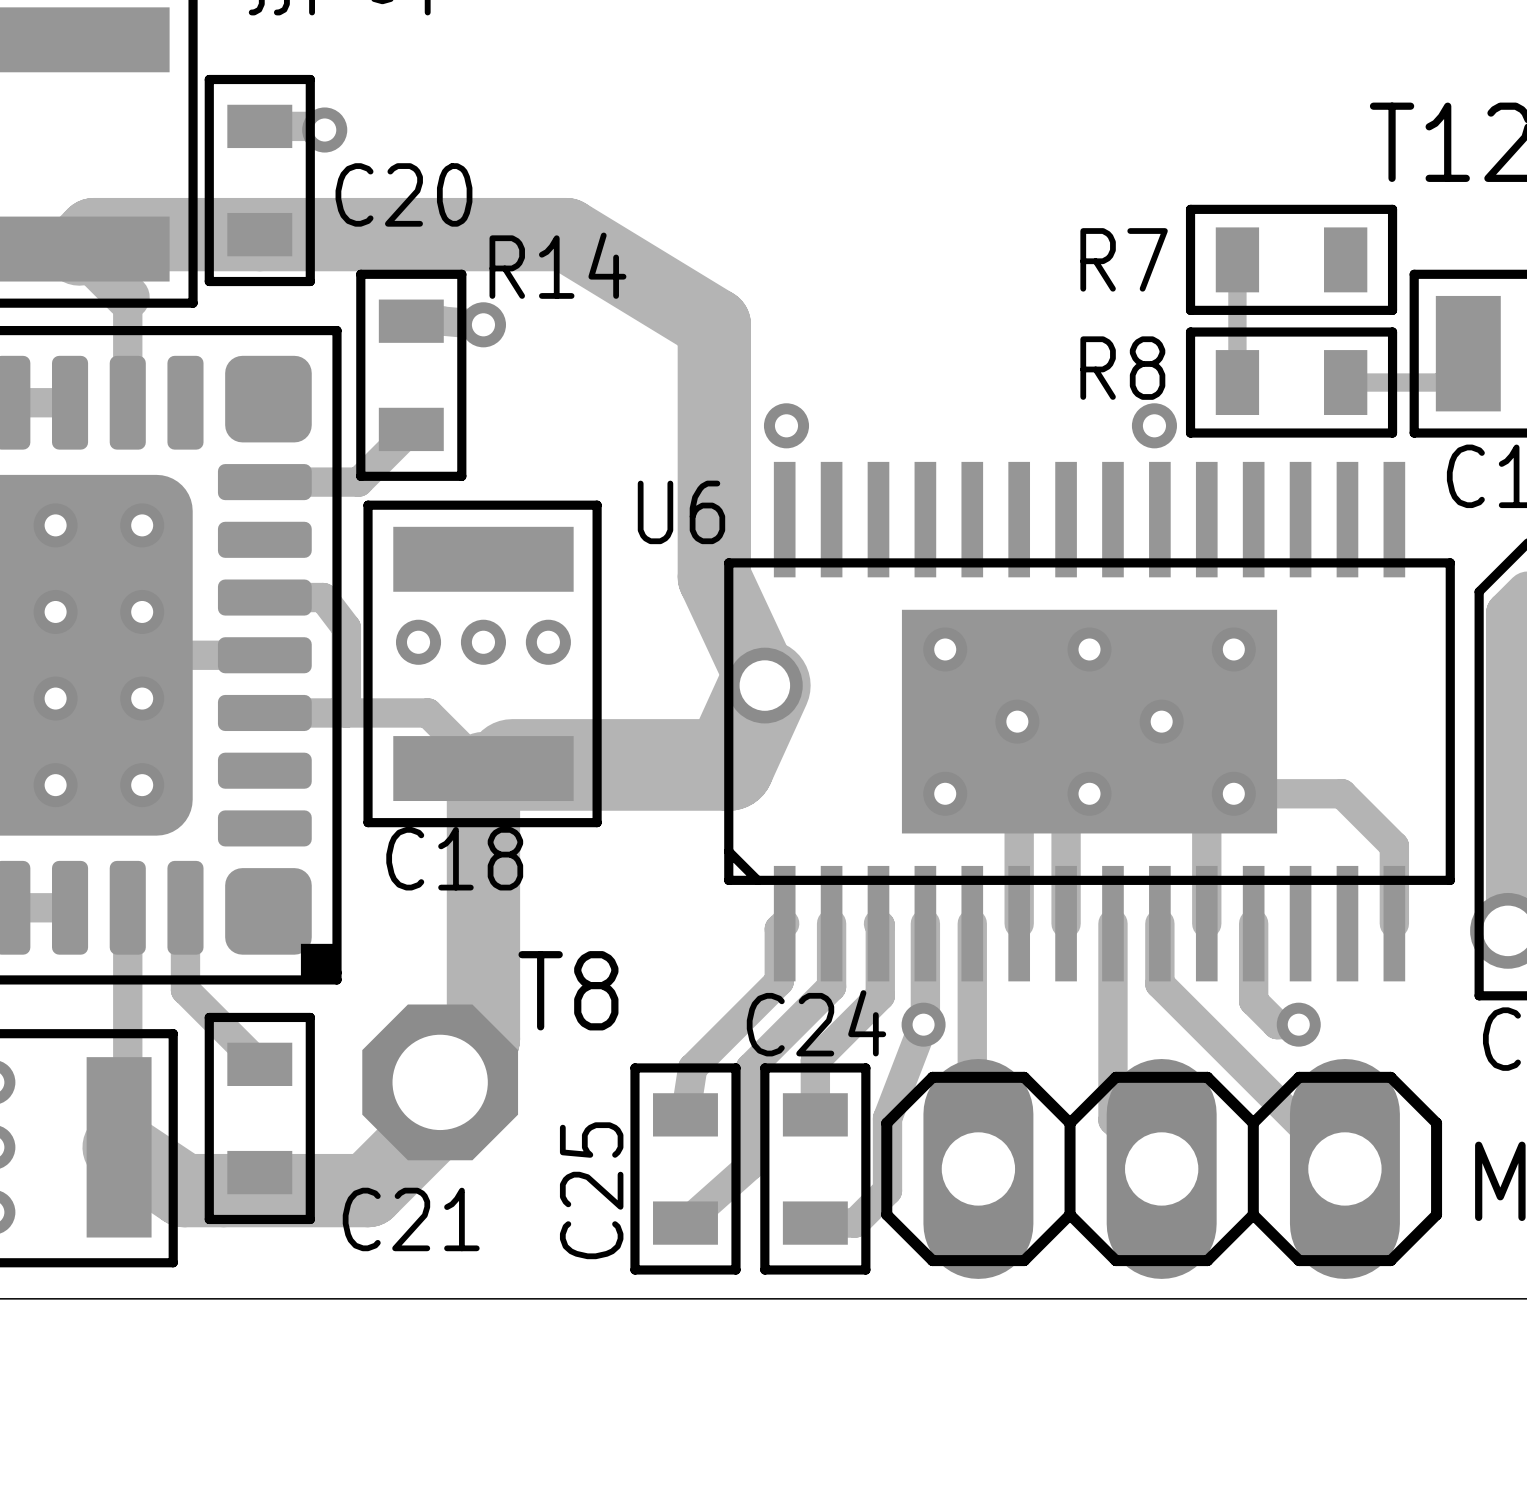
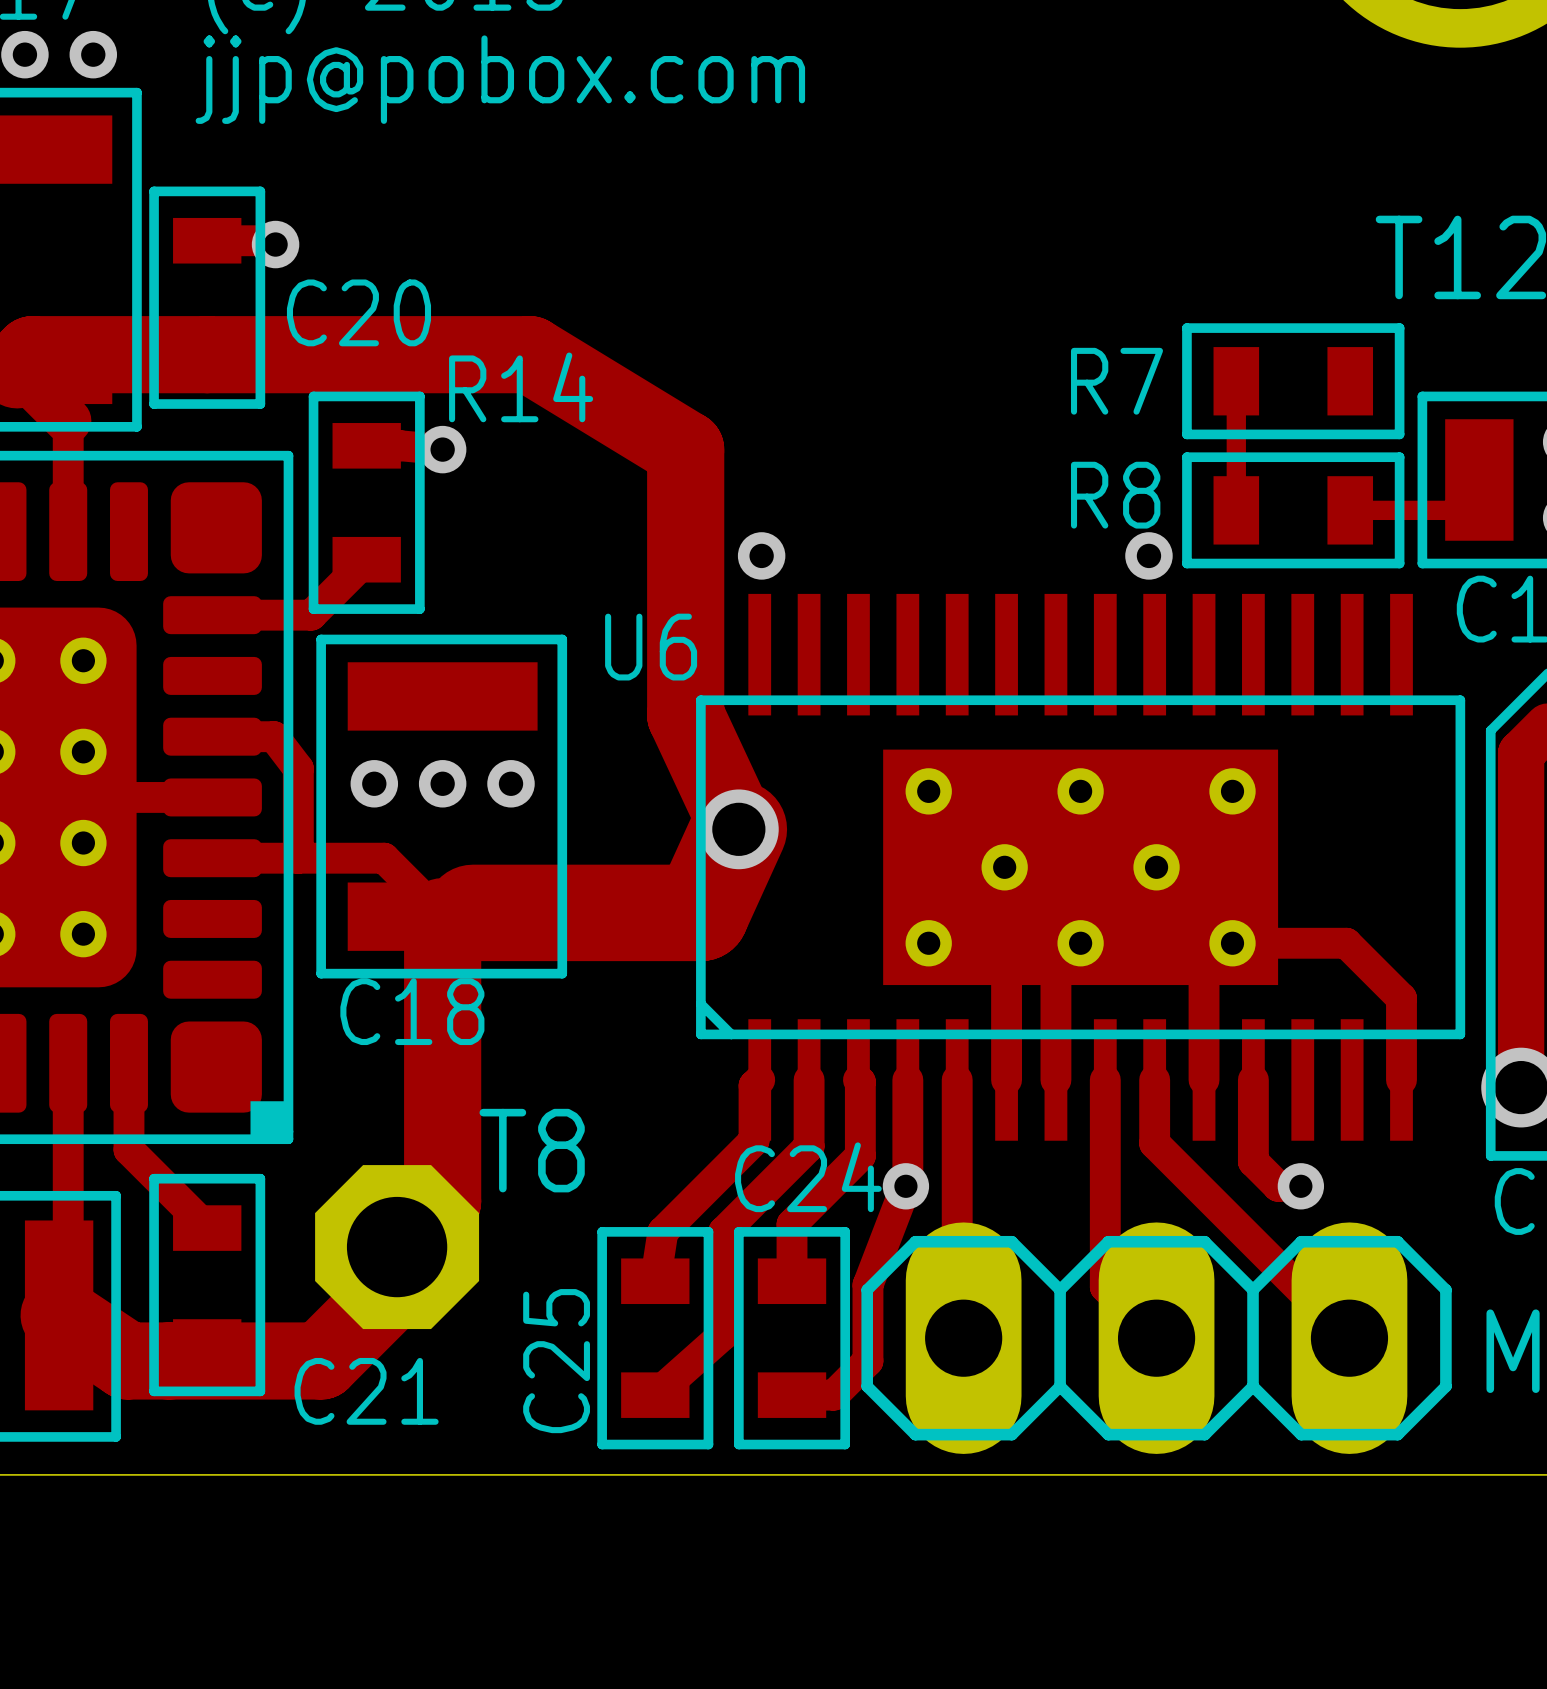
C24 name position: C24 (816, 1023) -> C24 (808, 1177)

